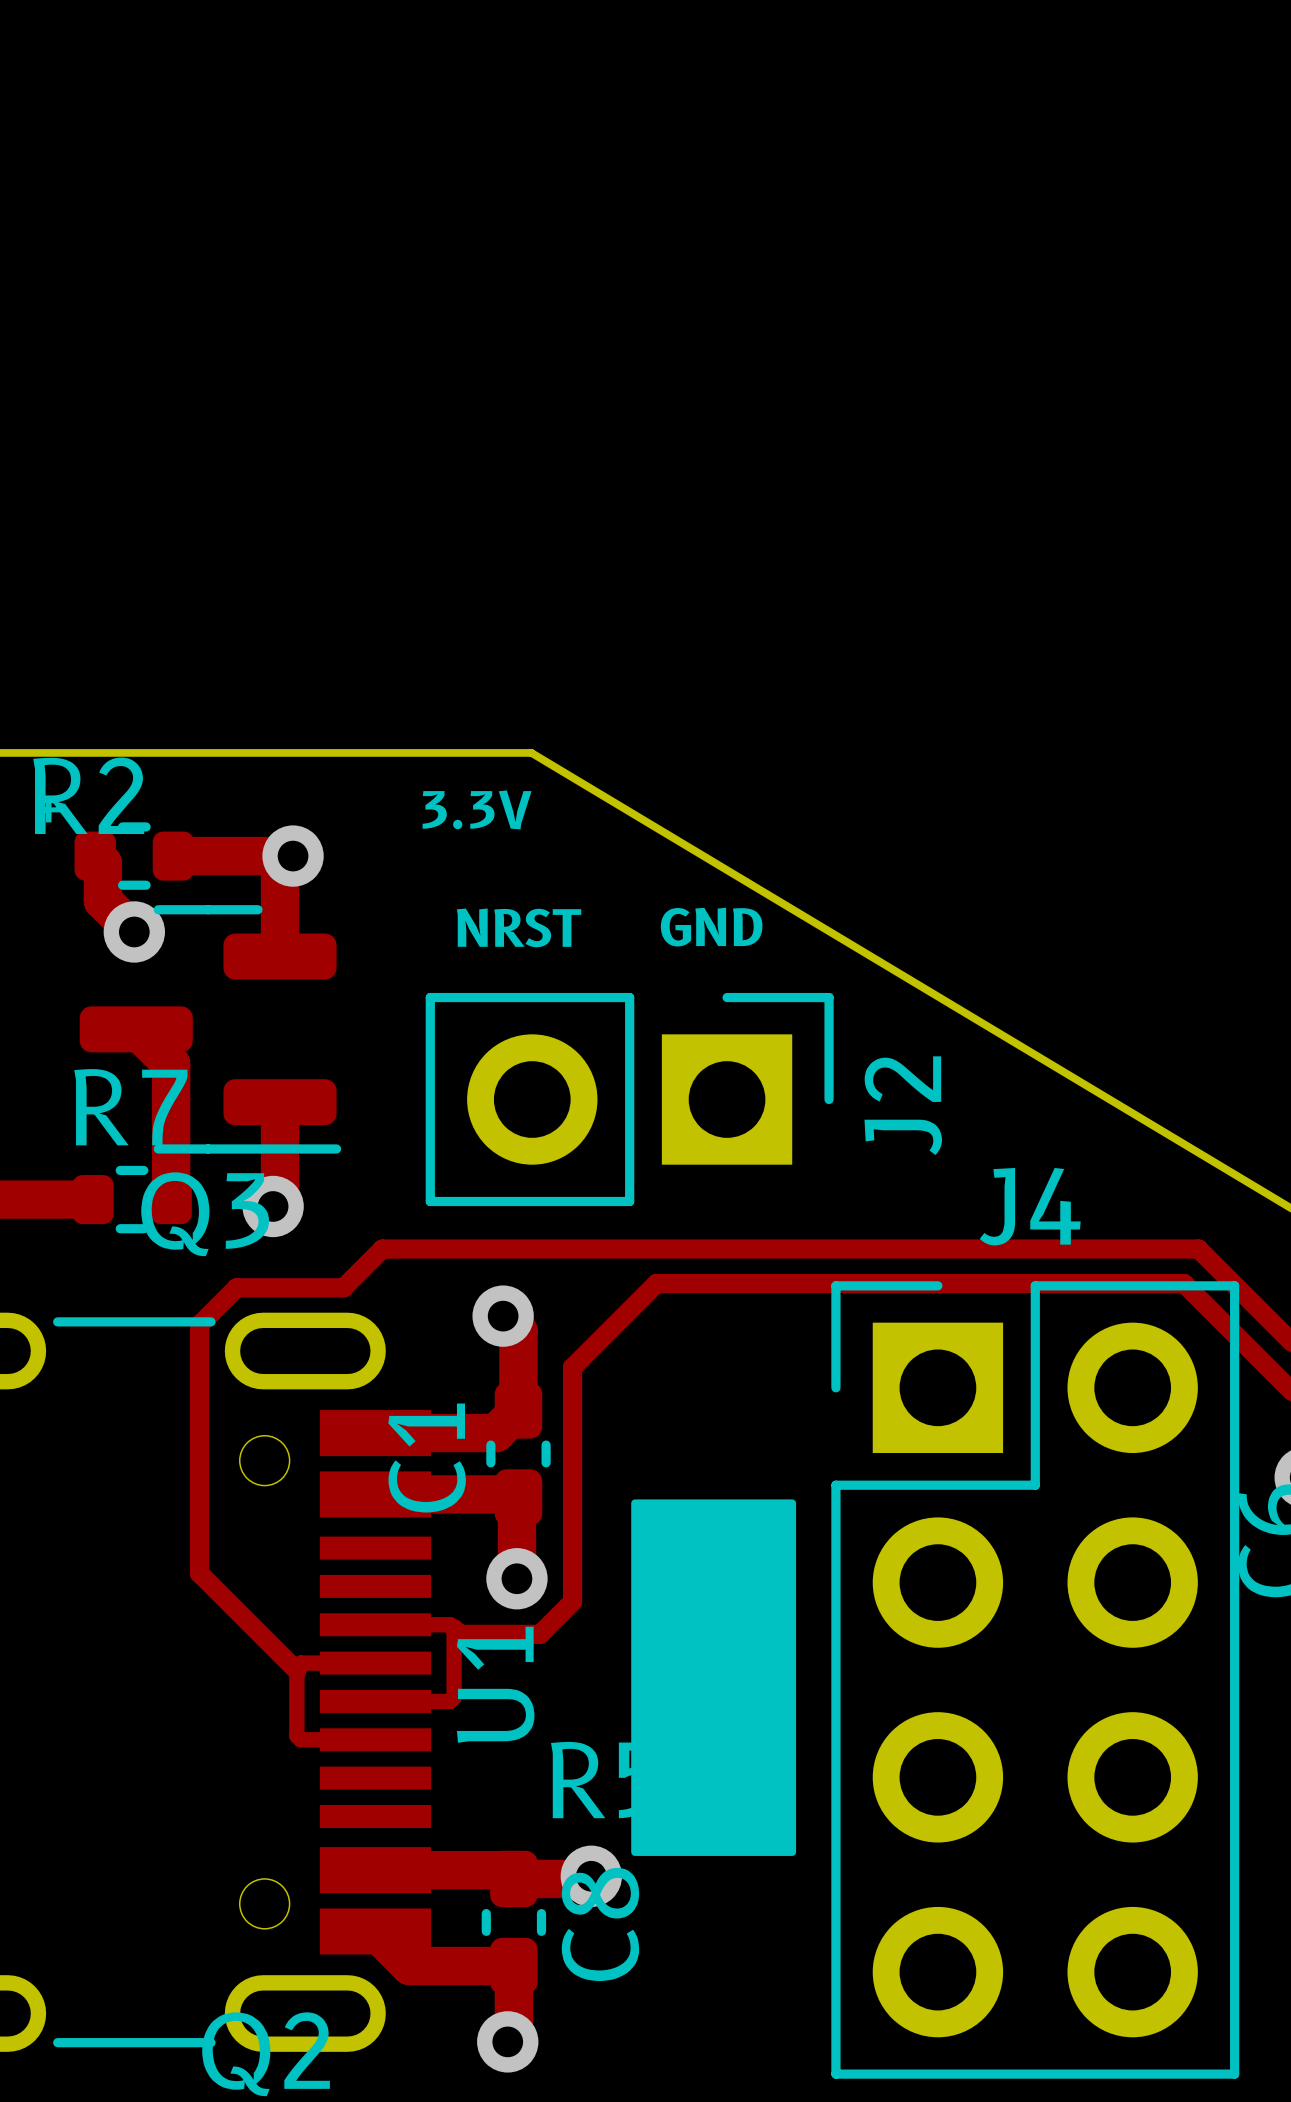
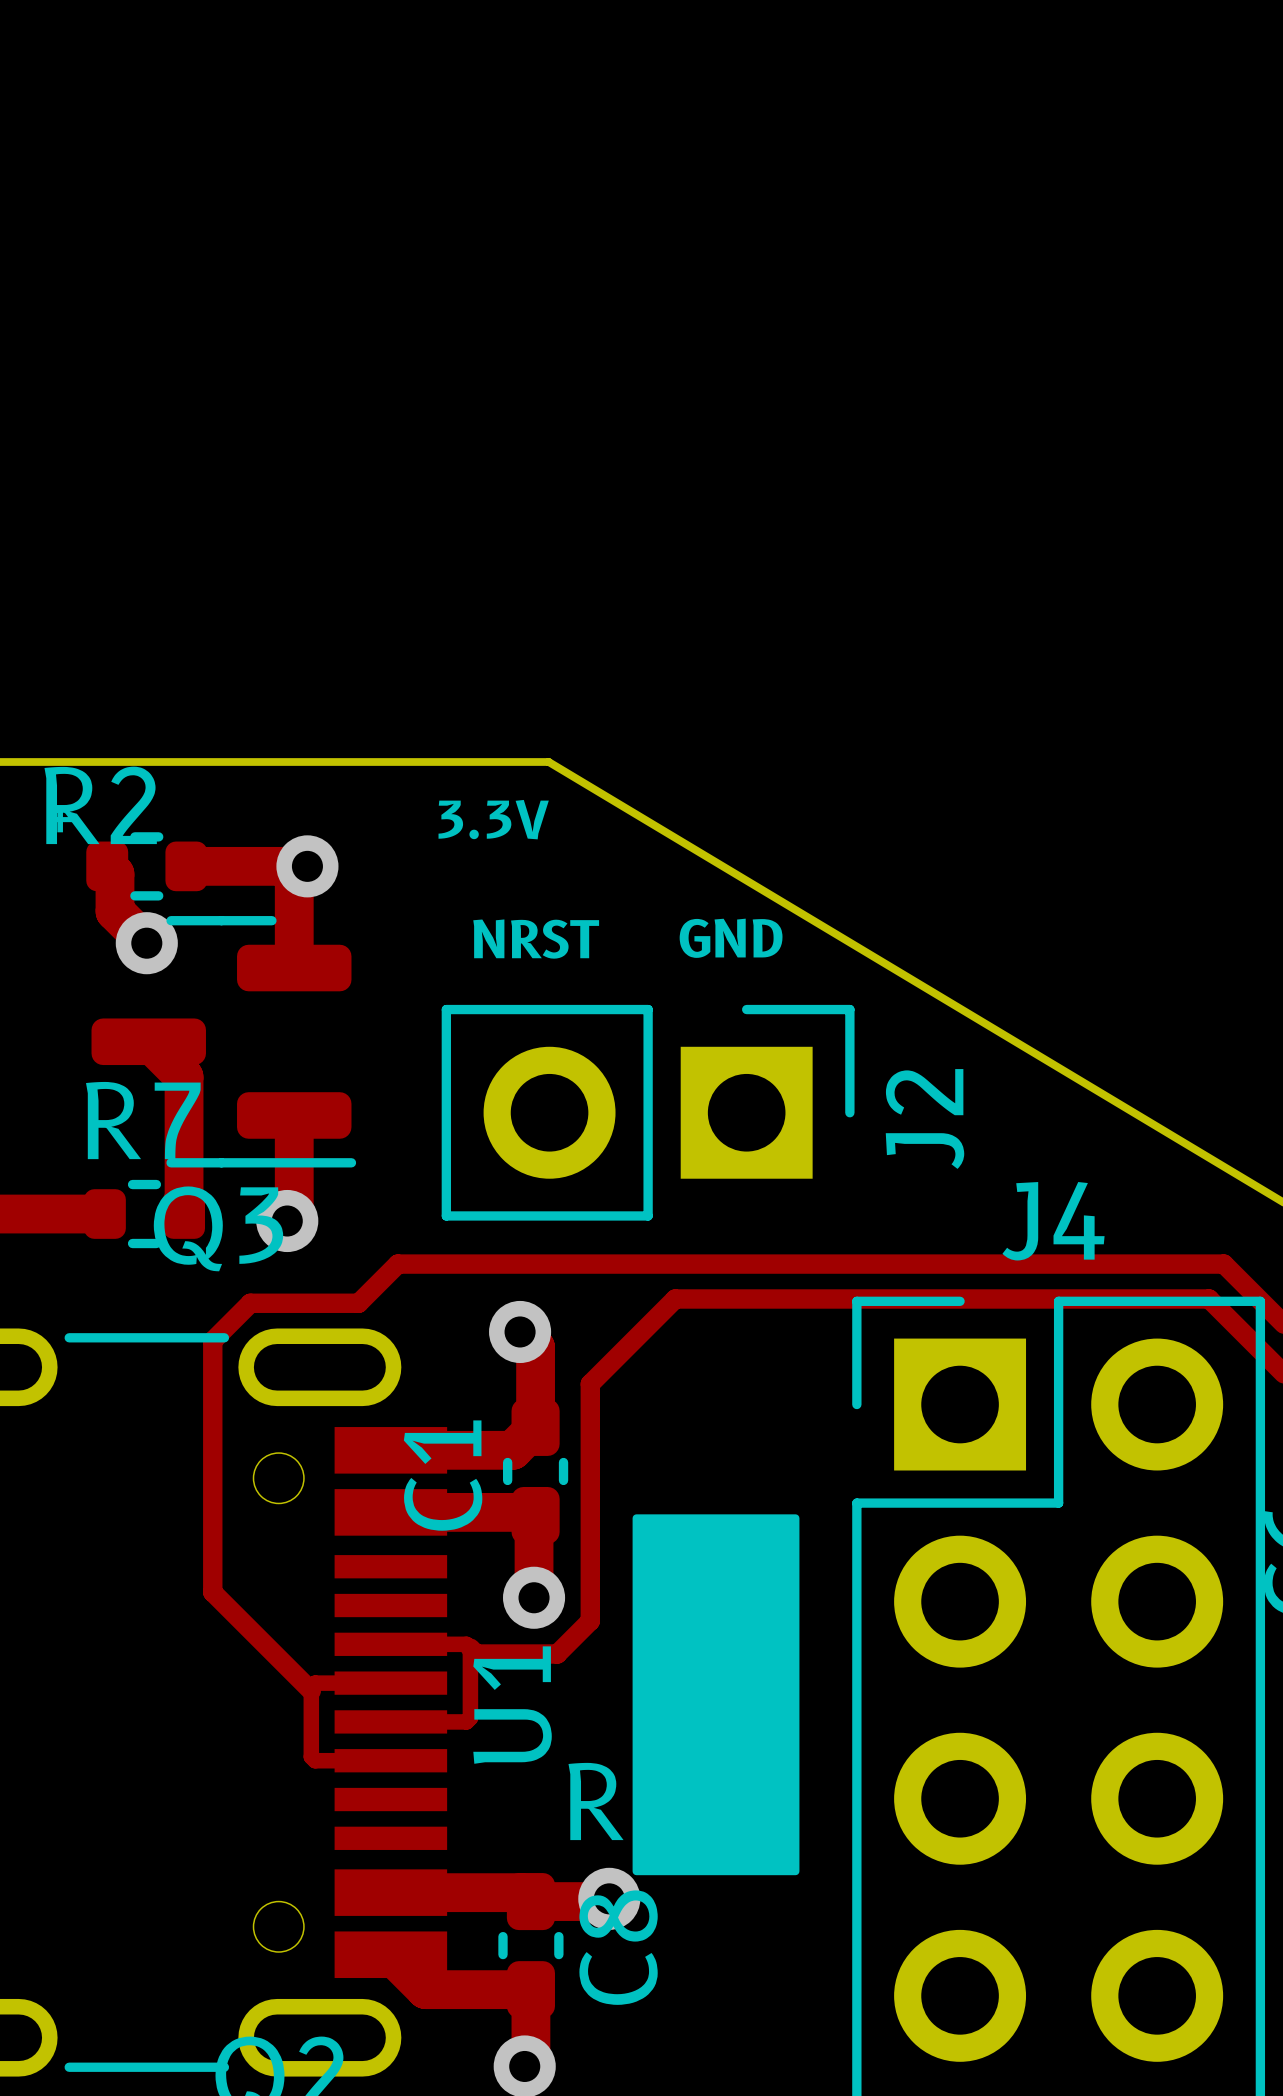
drawing position: (713, 1677) -> (716, 1694)

